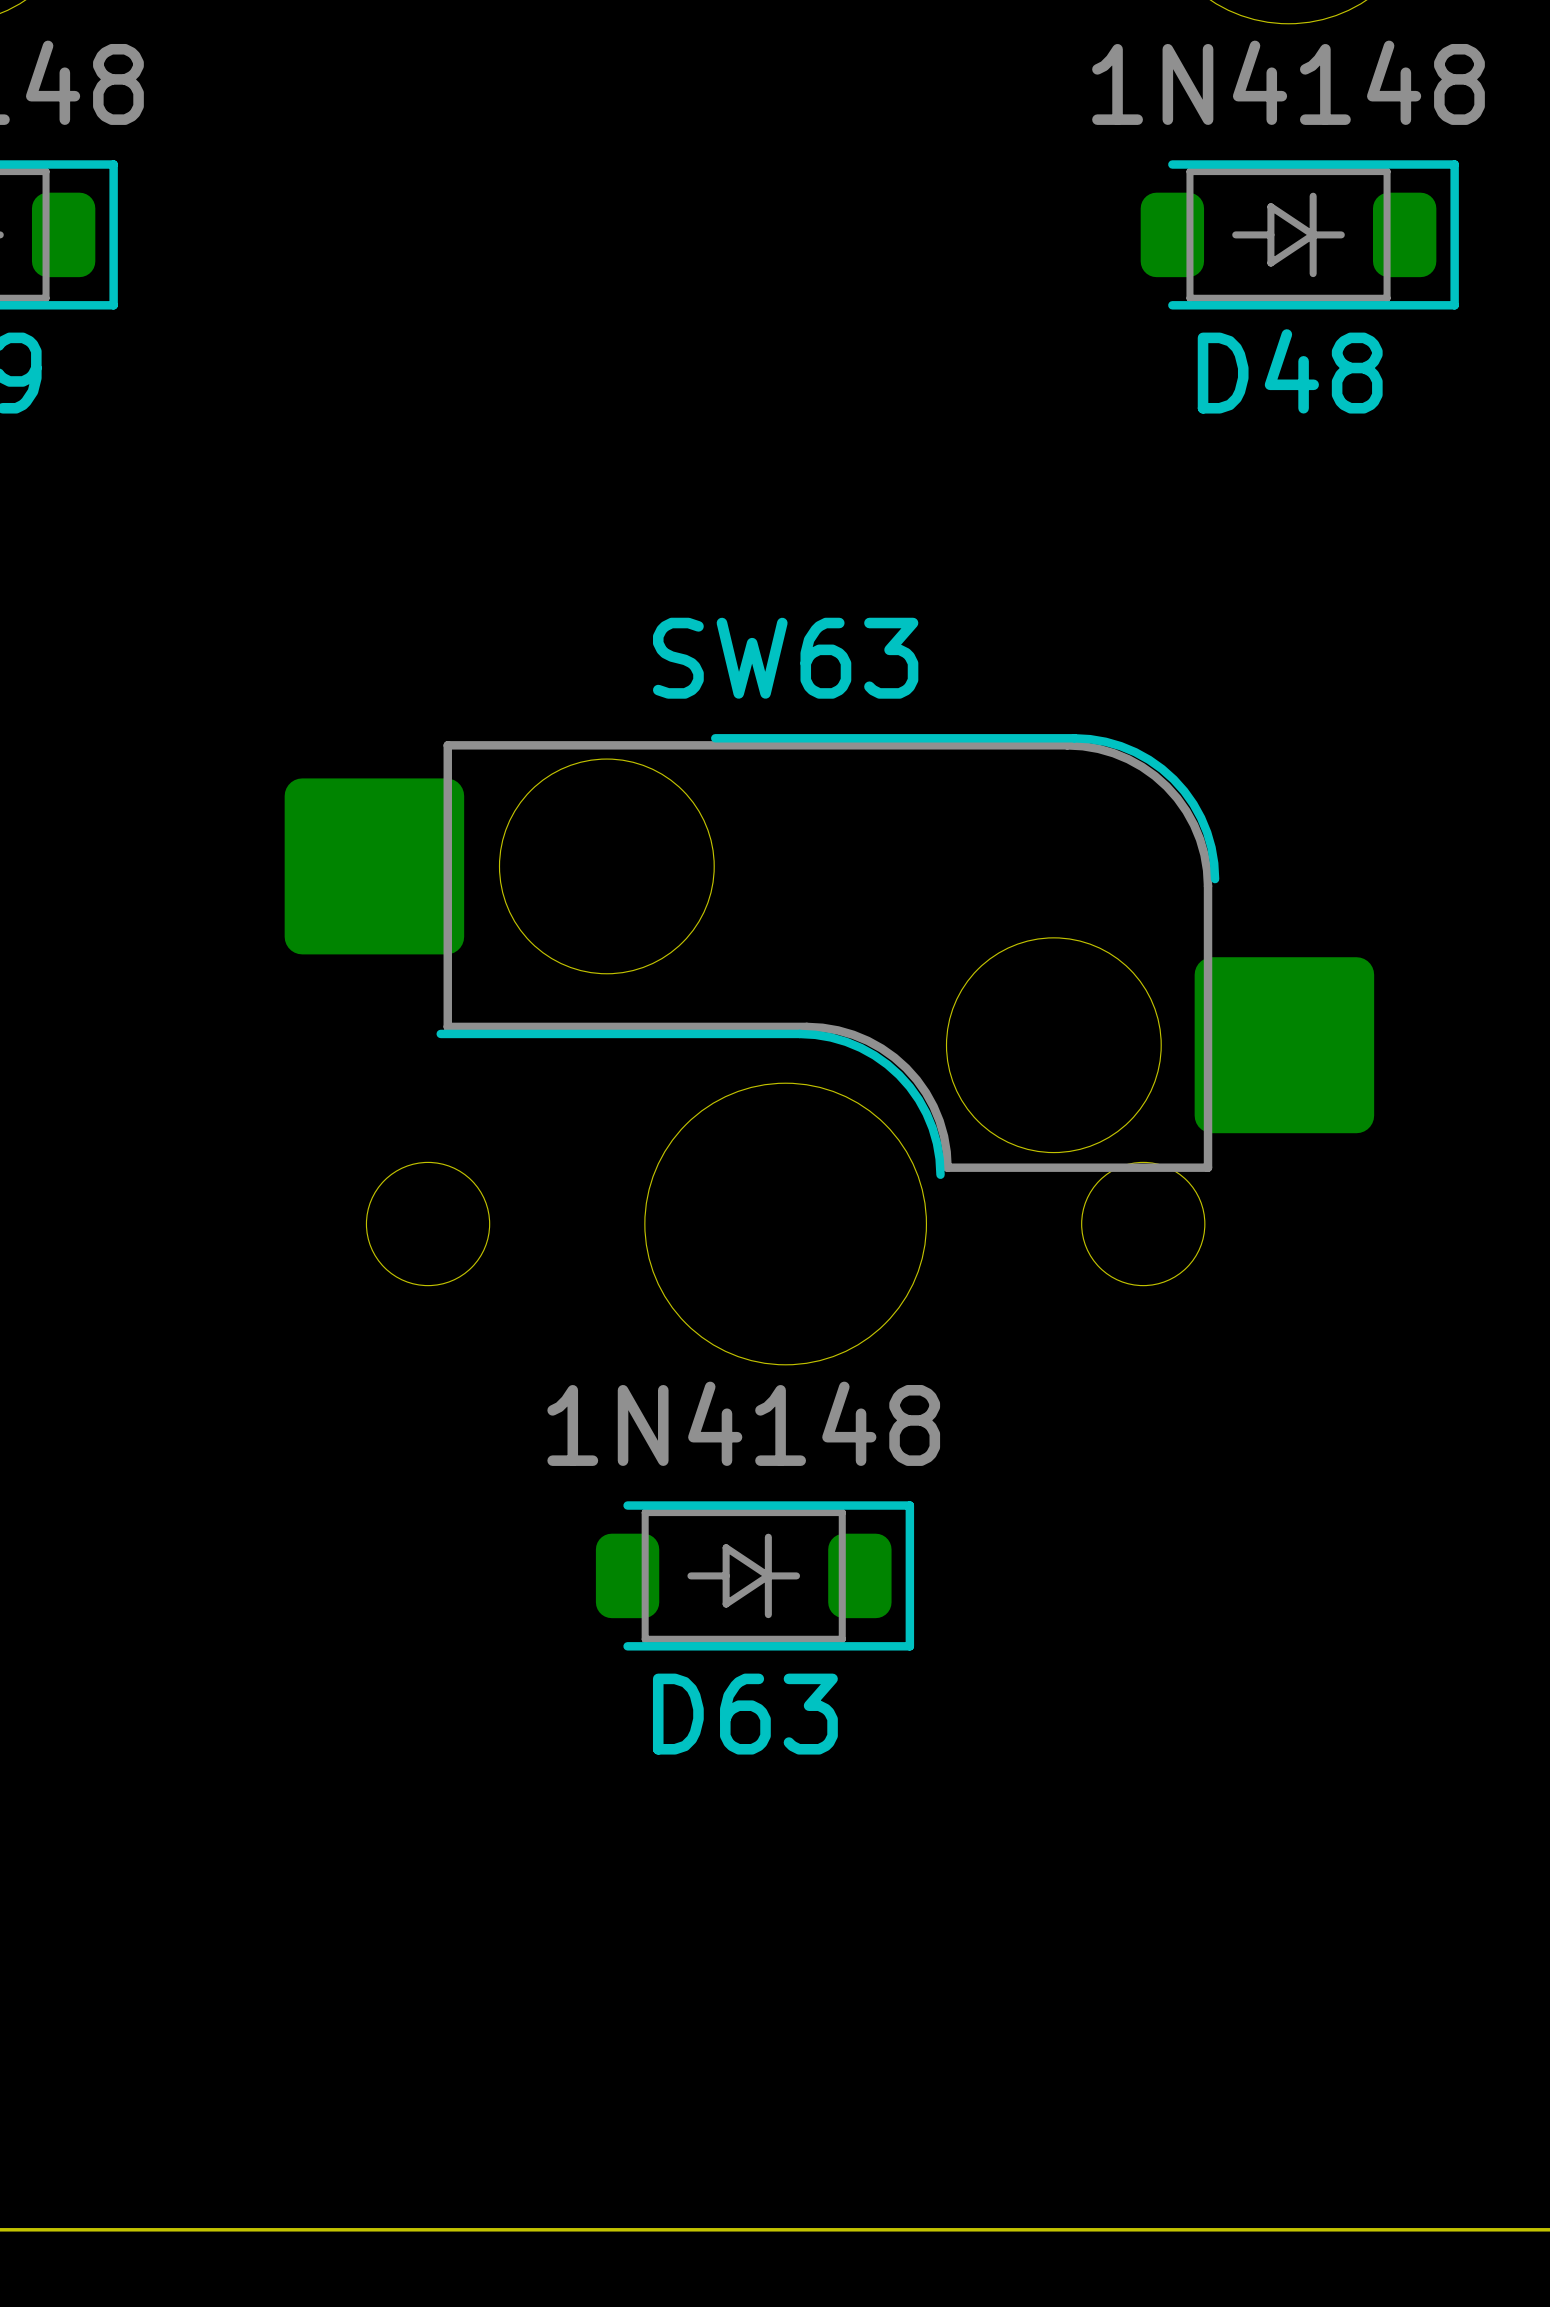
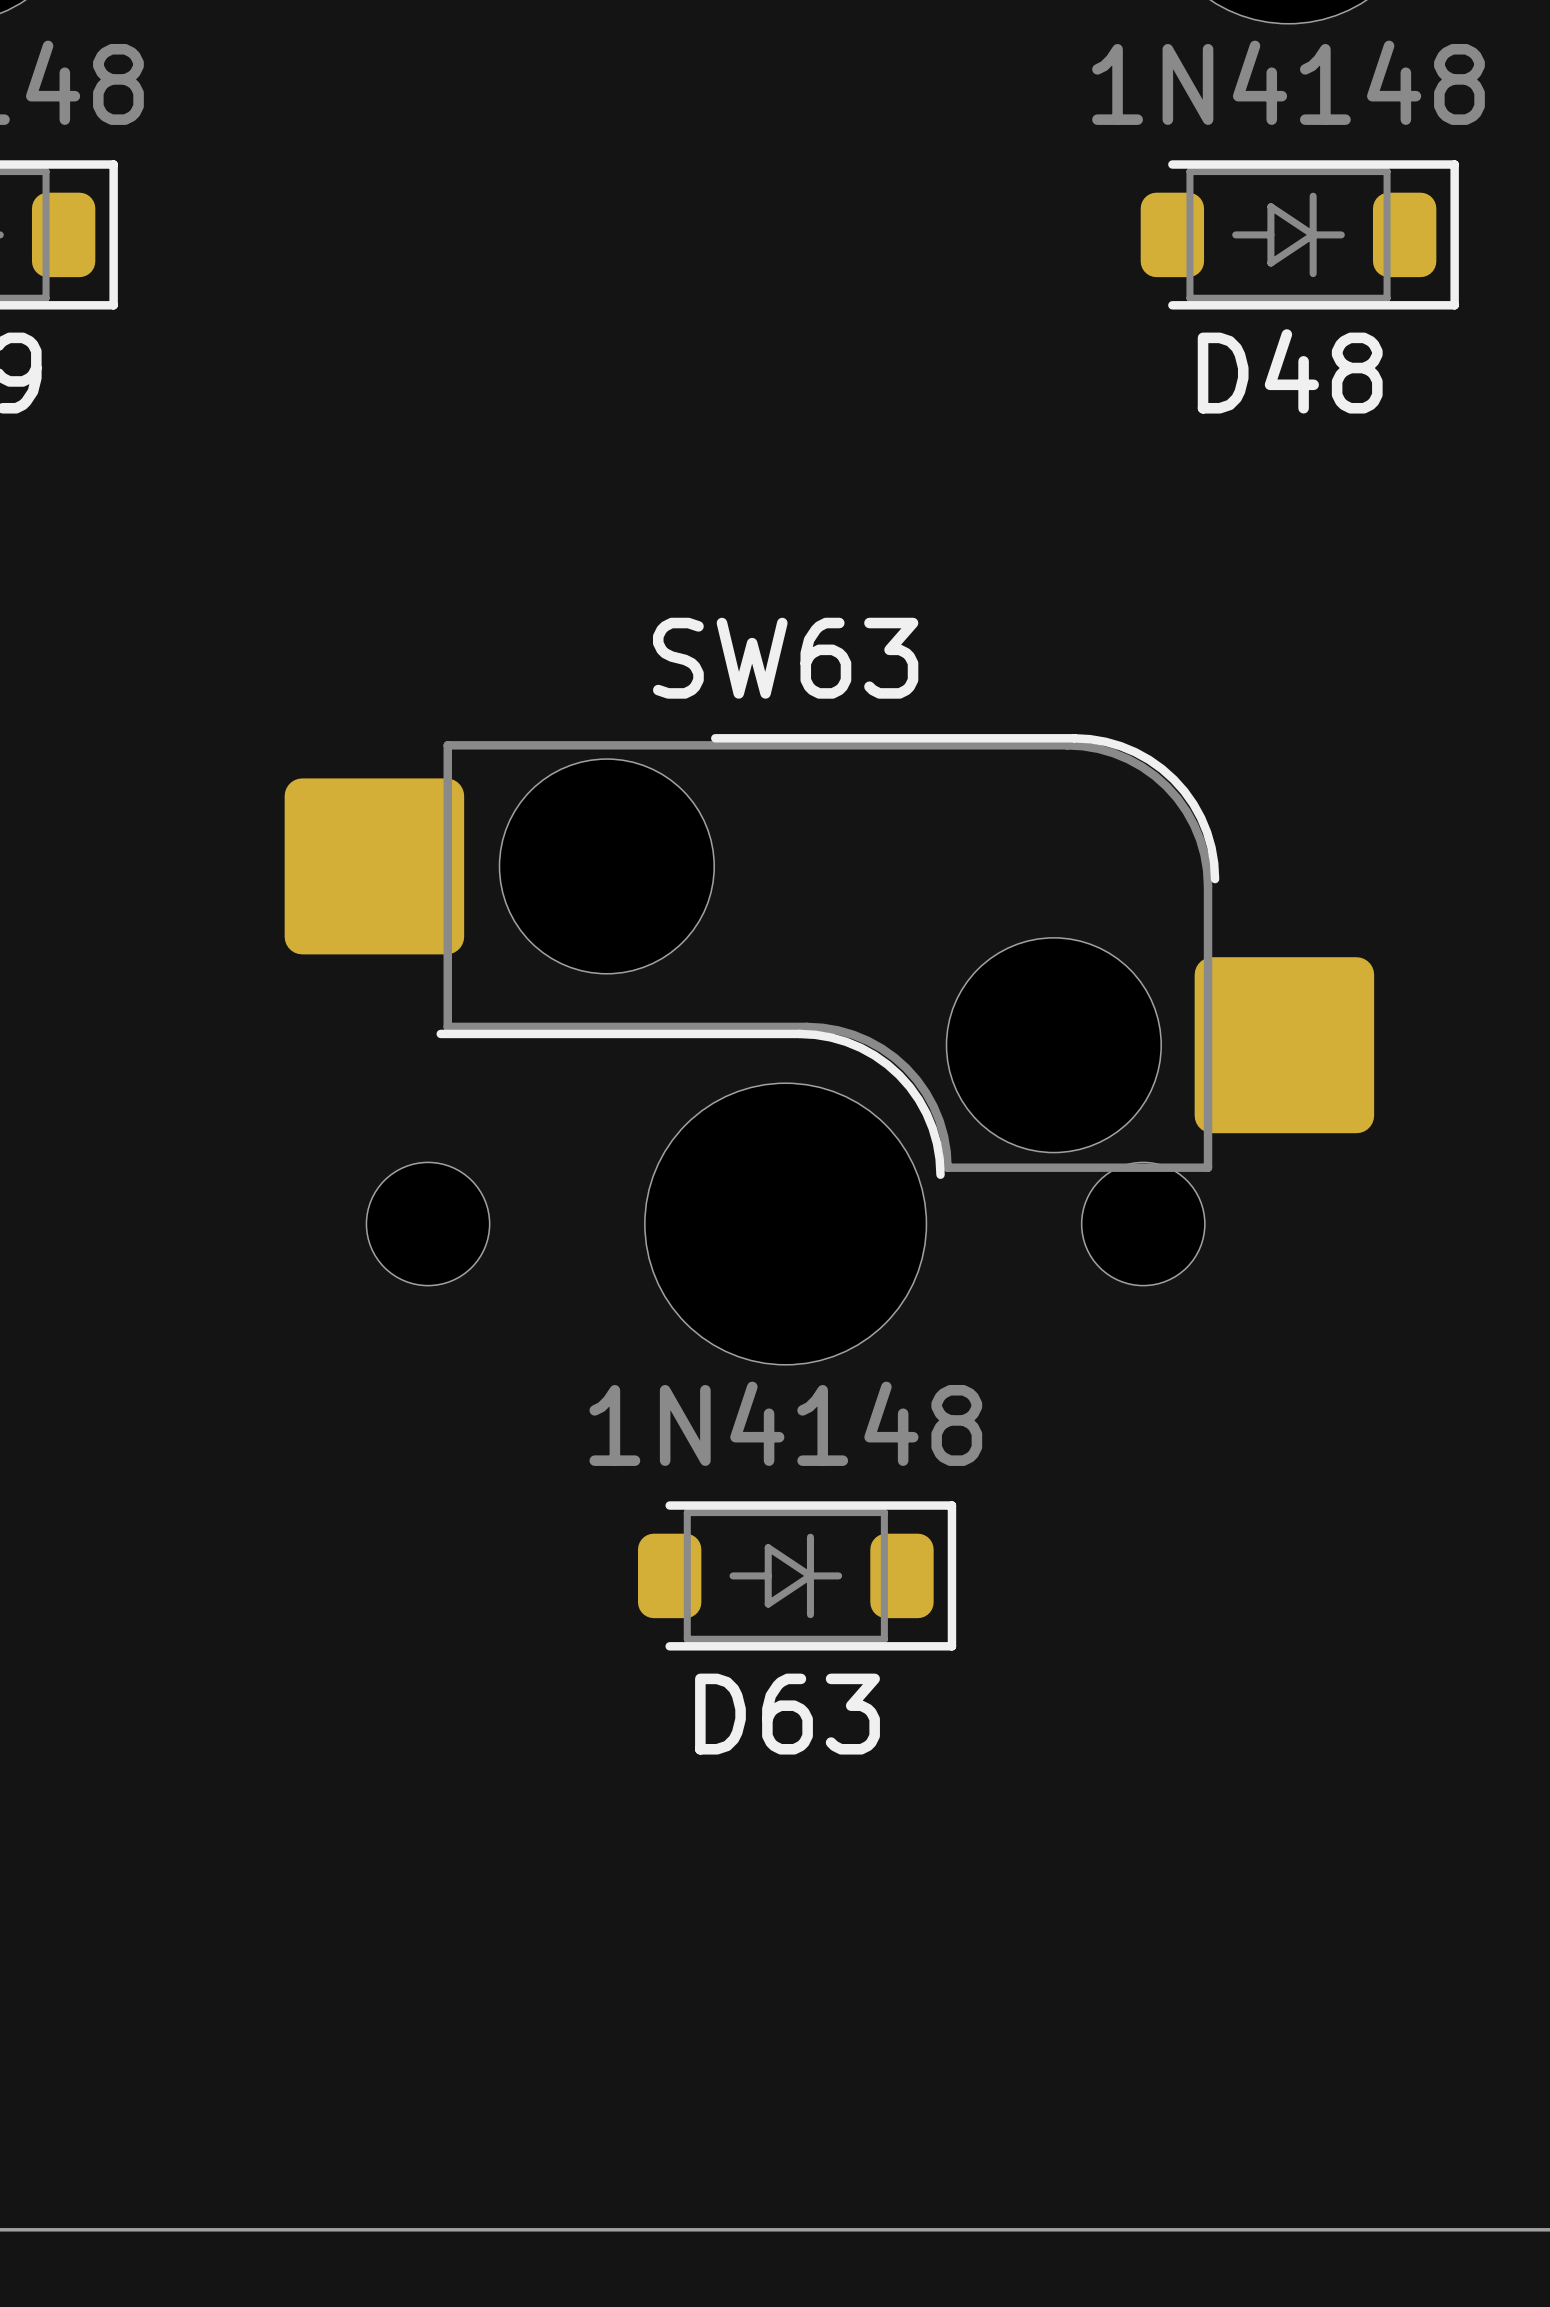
D63 position: (754, 1575) -> (797, 1575)

